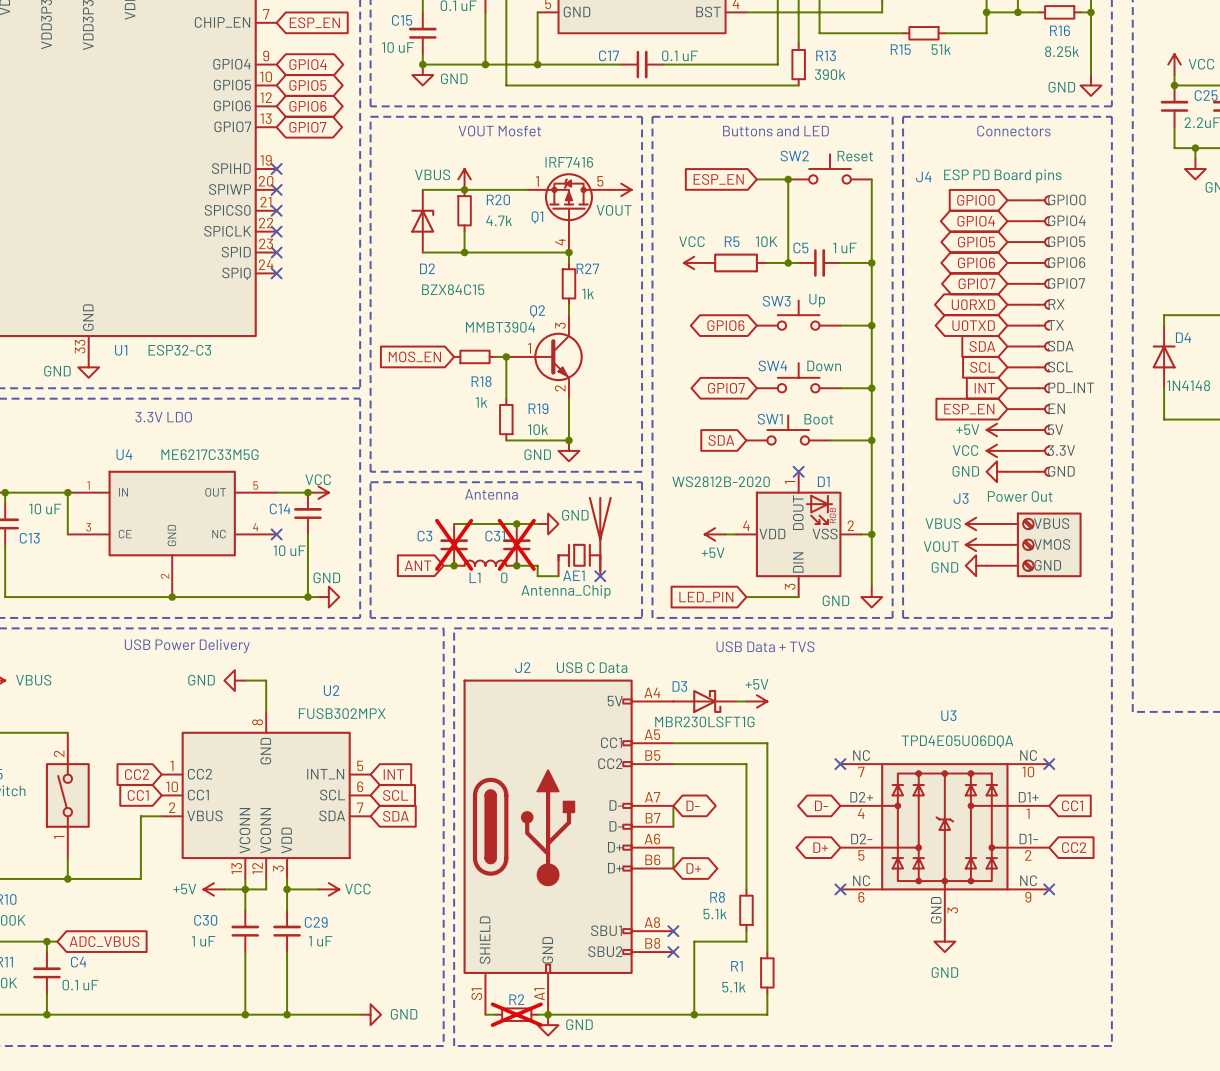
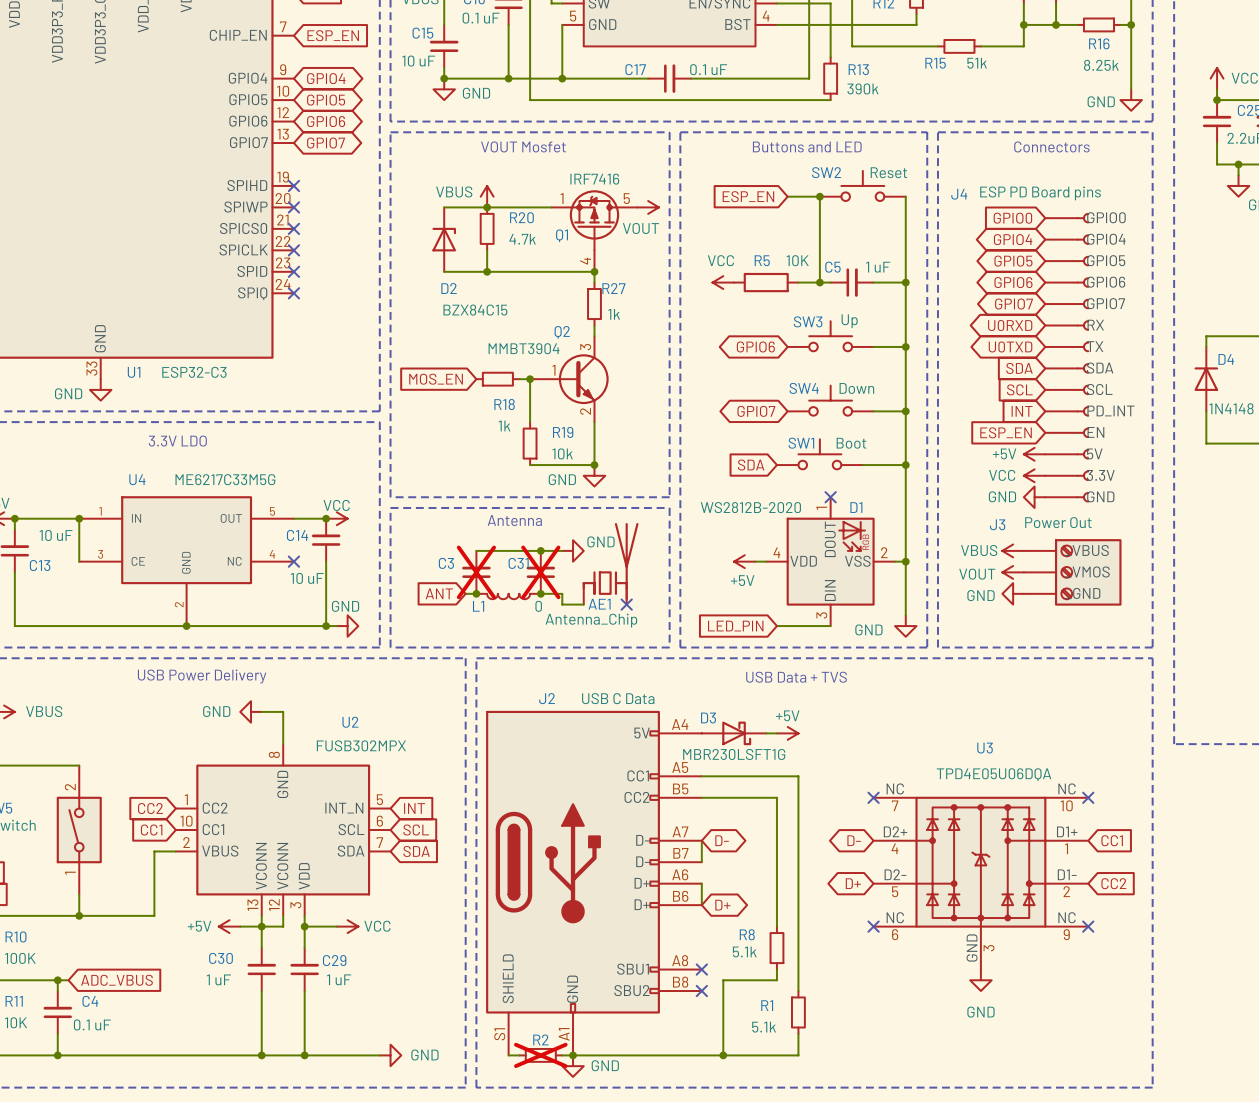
L1 rotation: 0° (485, 563) -> 180° (508, 596)
L1 name position: L1 (475, 577) -> L1 (478, 606)

